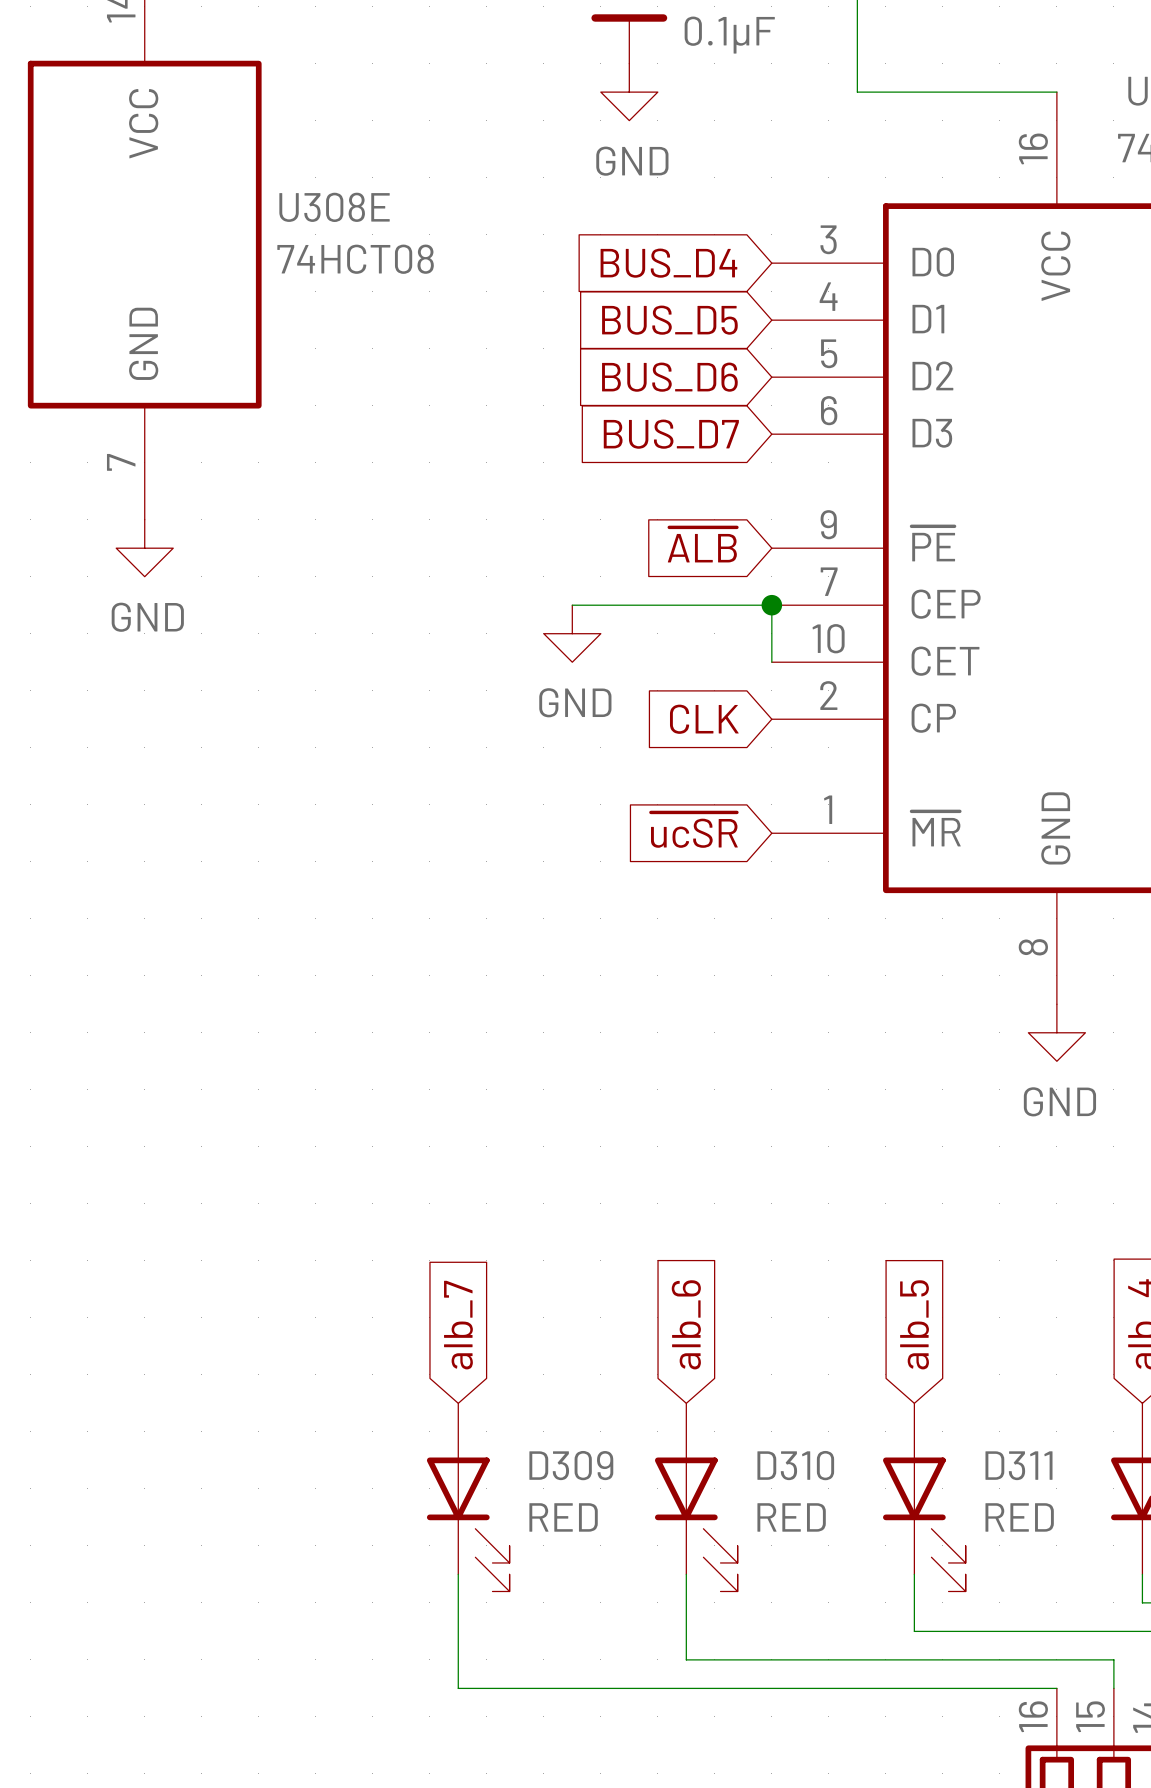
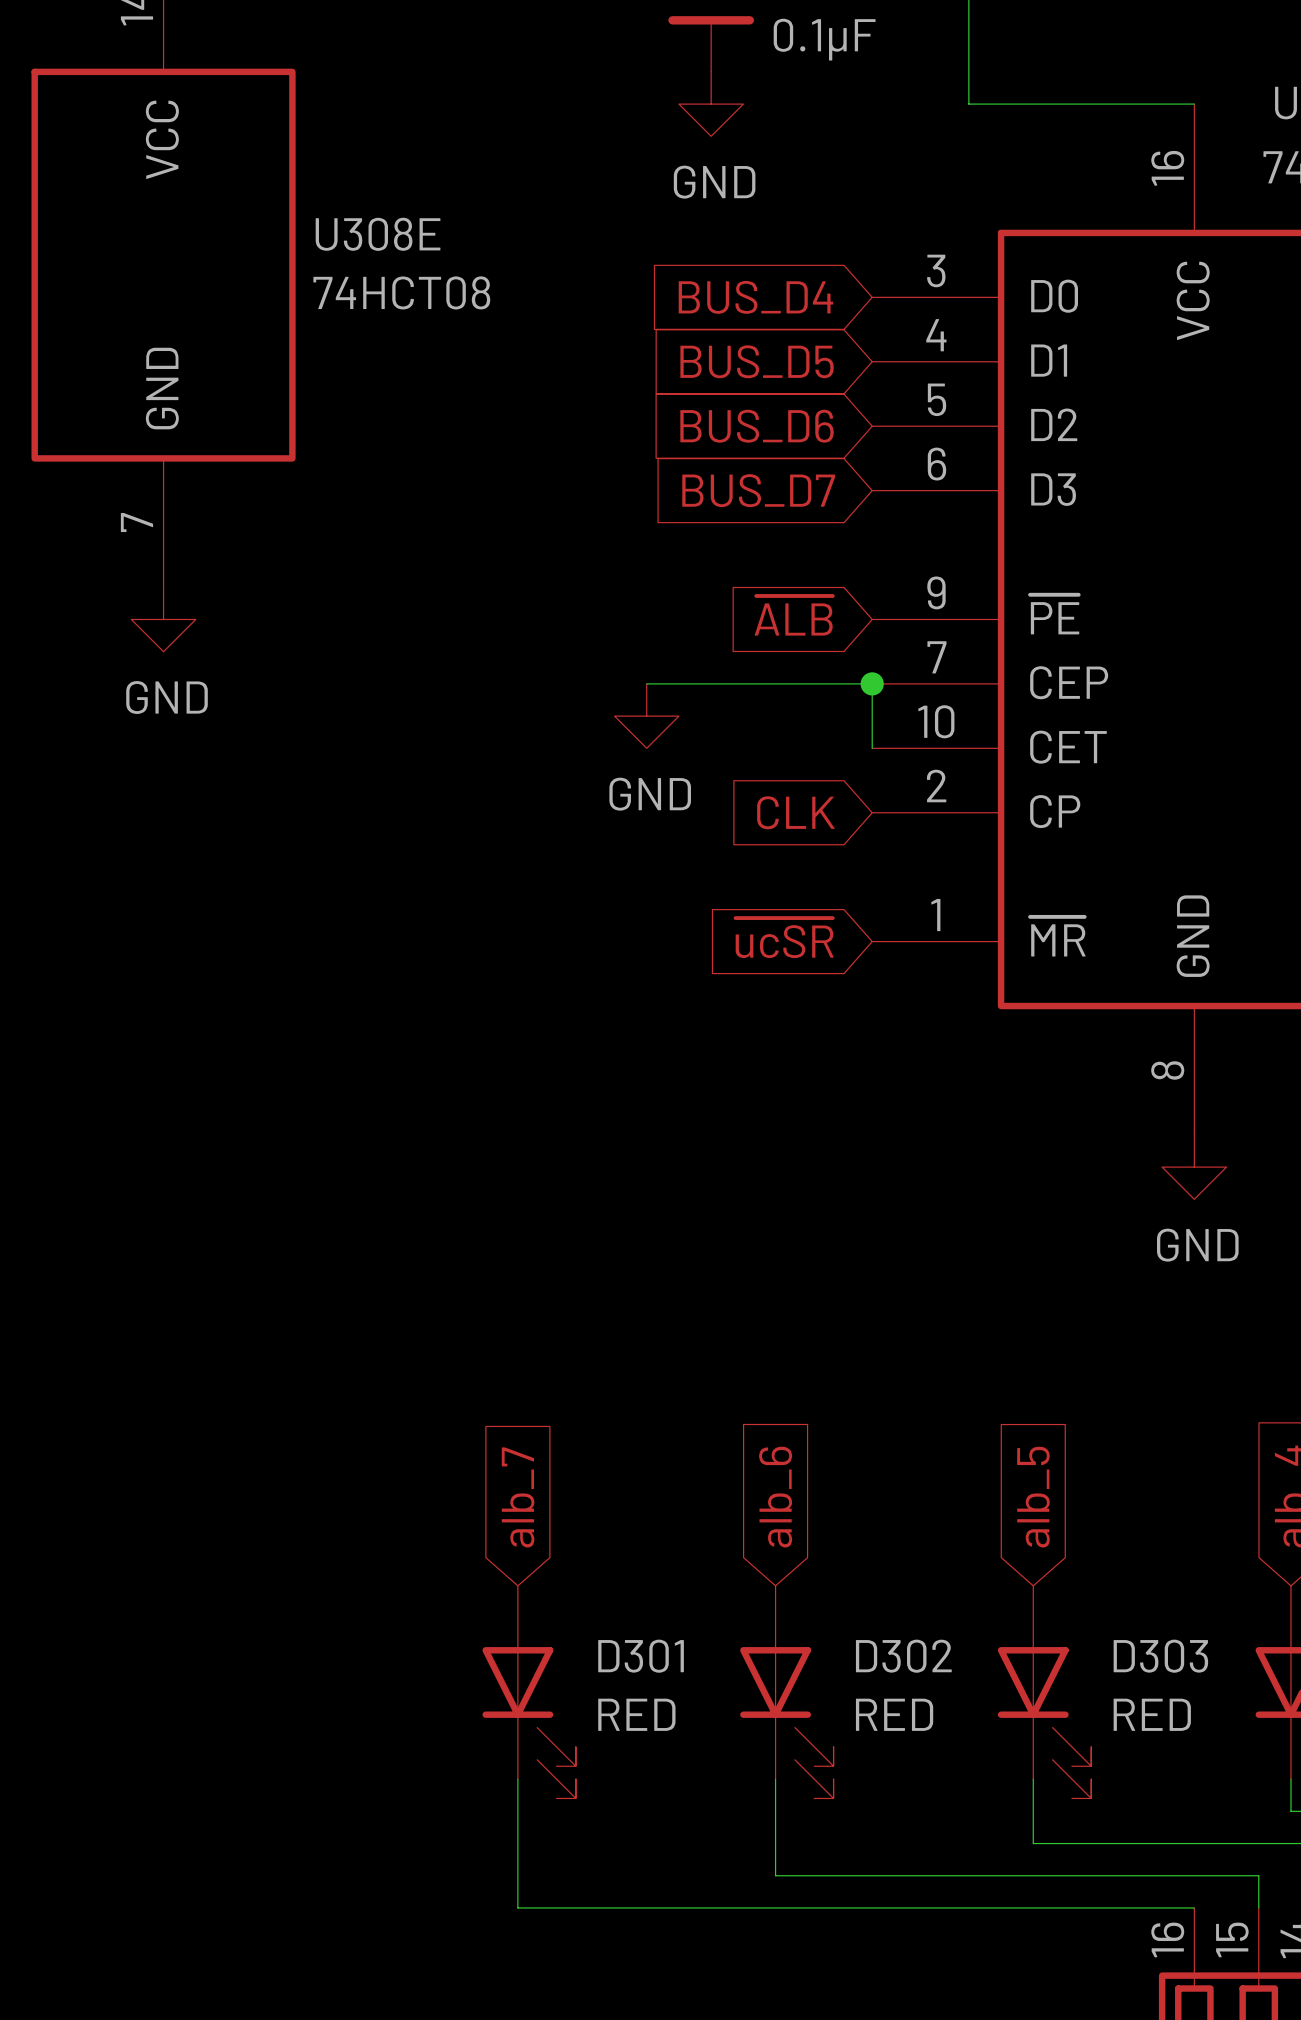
D309 name: D309 (571, 1465) -> D301 (641, 1656)
D310 name: D310 (795, 1465) -> D302 (903, 1656)
D311 name: D311 (1018, 1465) -> D303 (1160, 1656)

